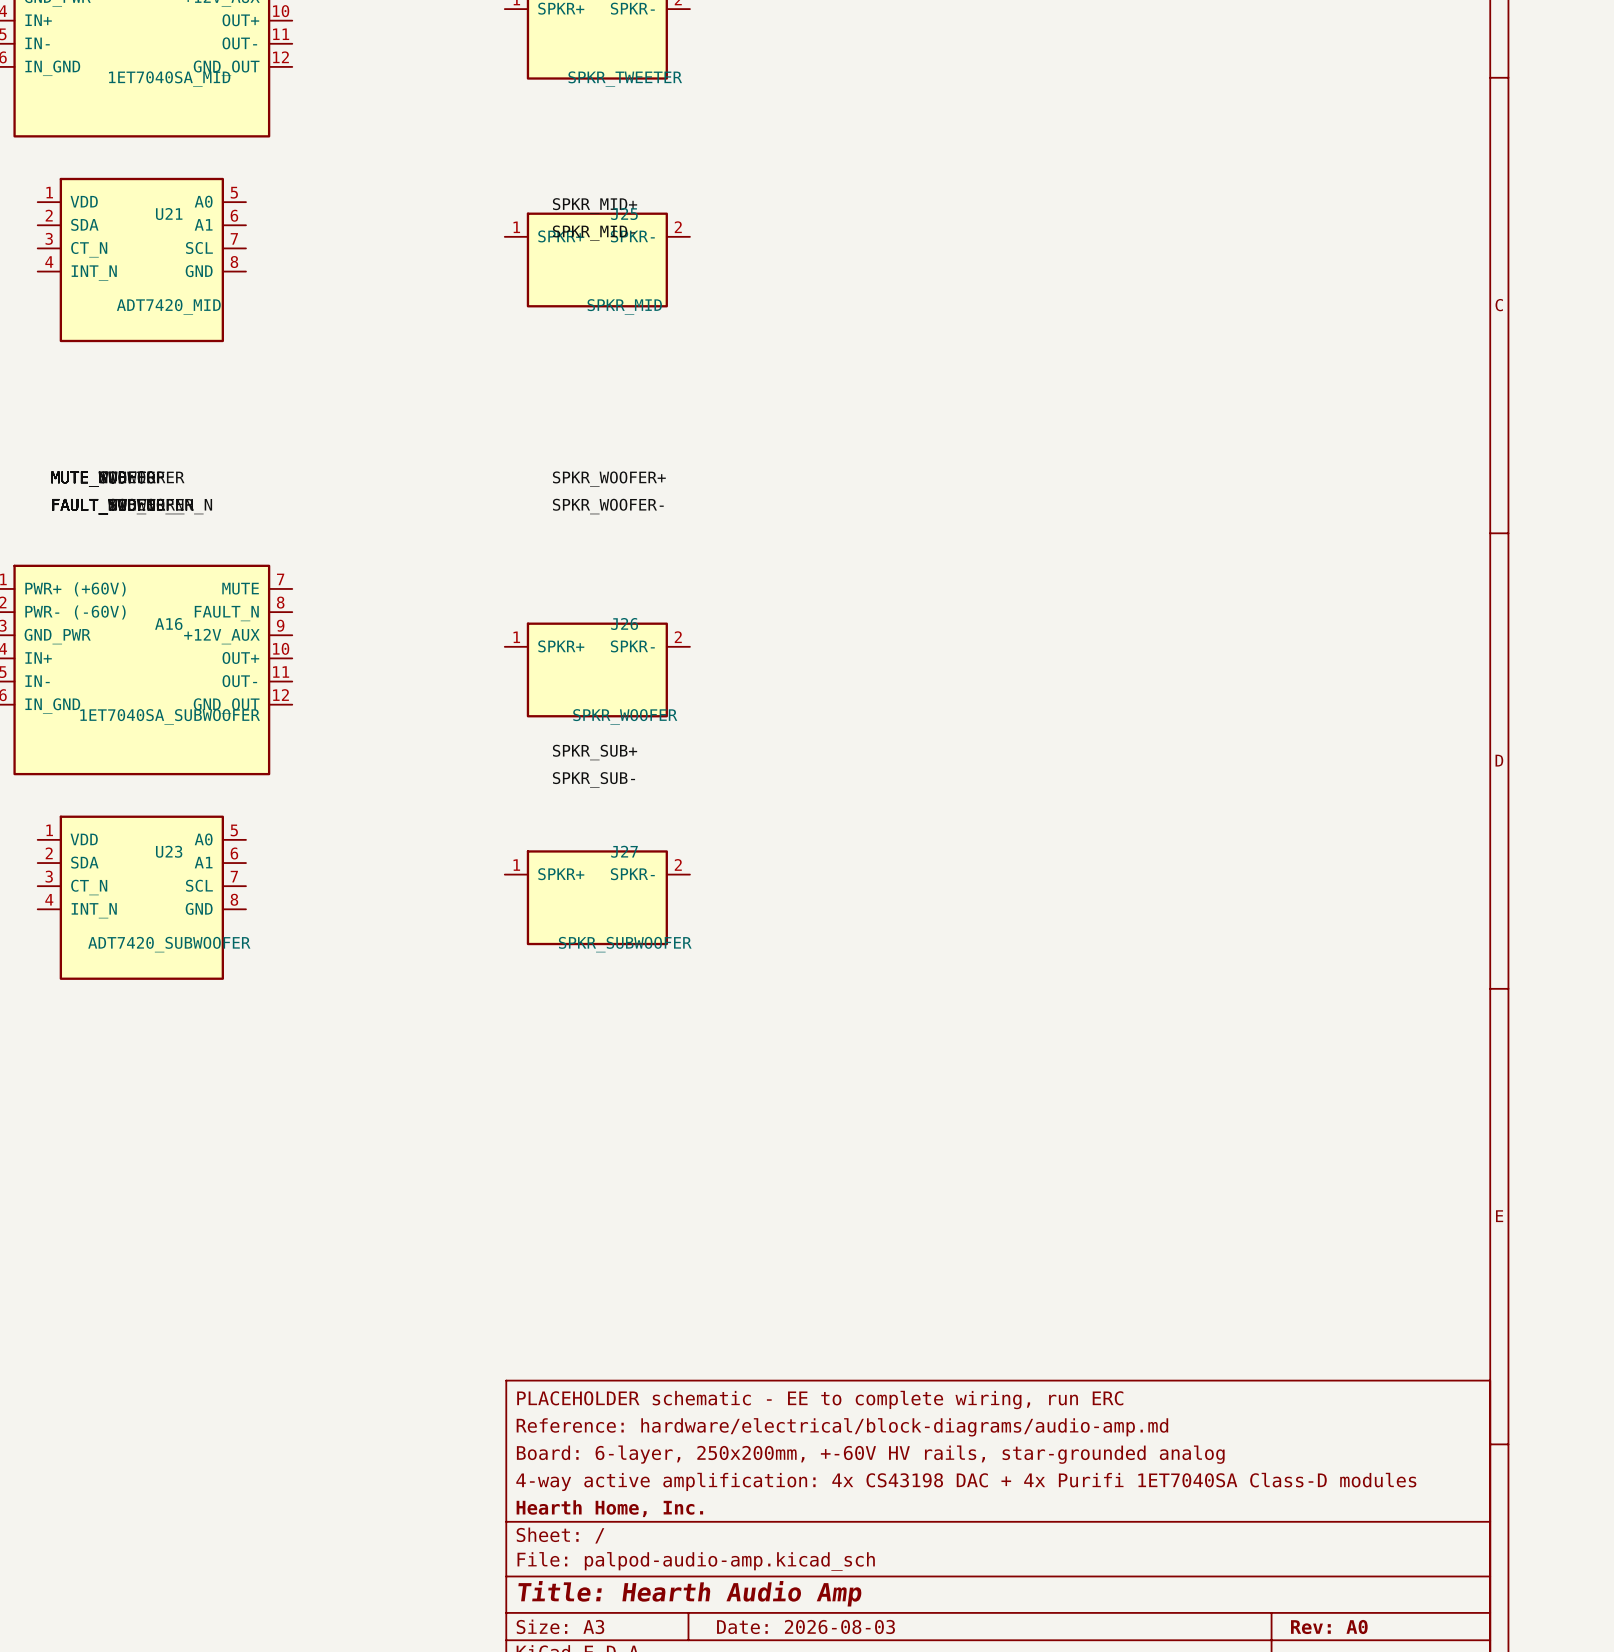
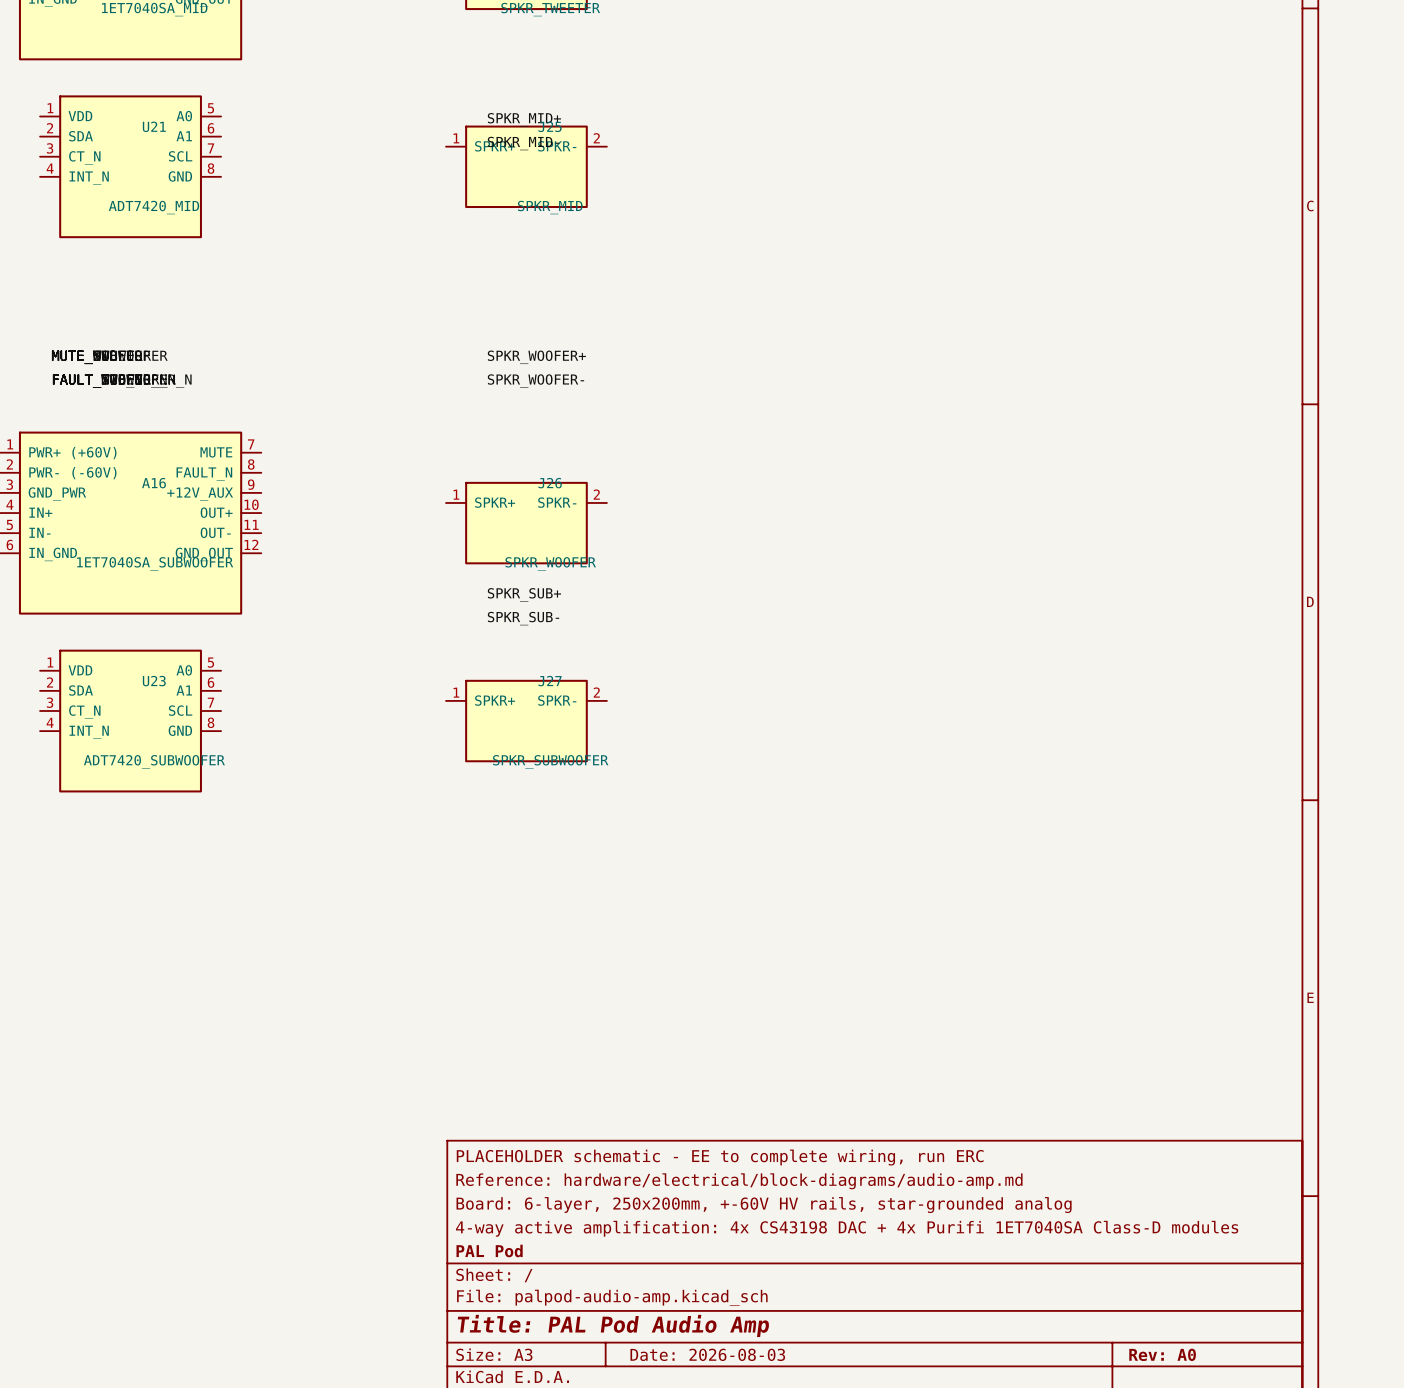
title block: Hearth Home, Inc. (609, 1508) -> PAL Pod (489, 1250)
title block: Title: Hearth Audio Amp (690, 1593) -> Title: PAL Pod Audio Amp (613, 1325)

